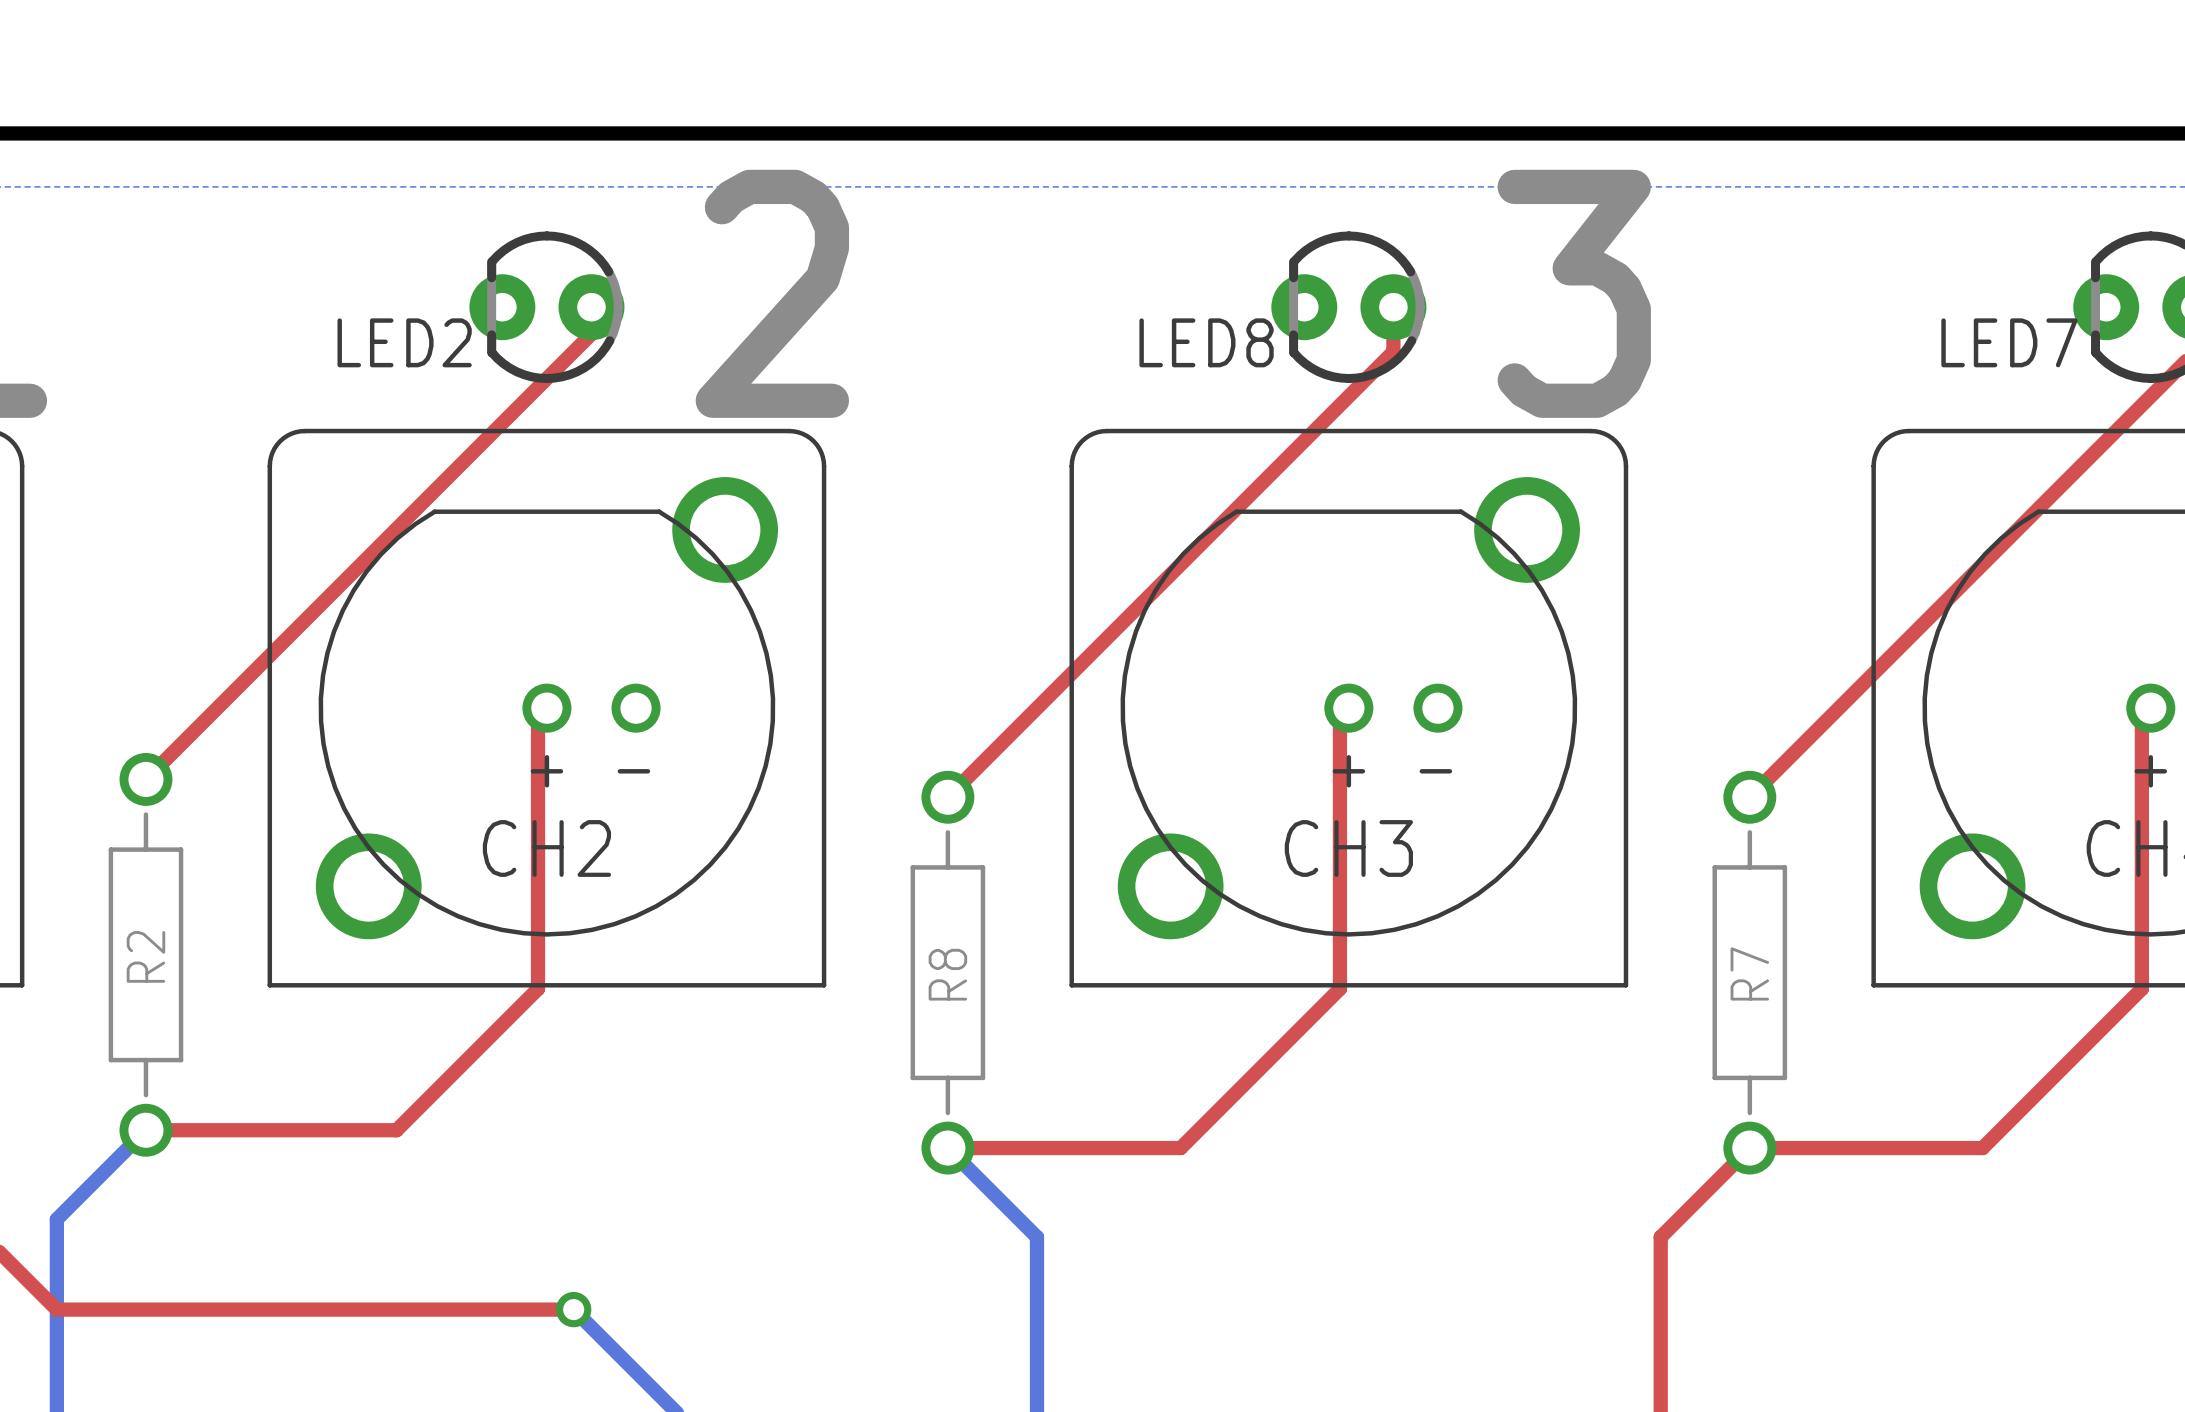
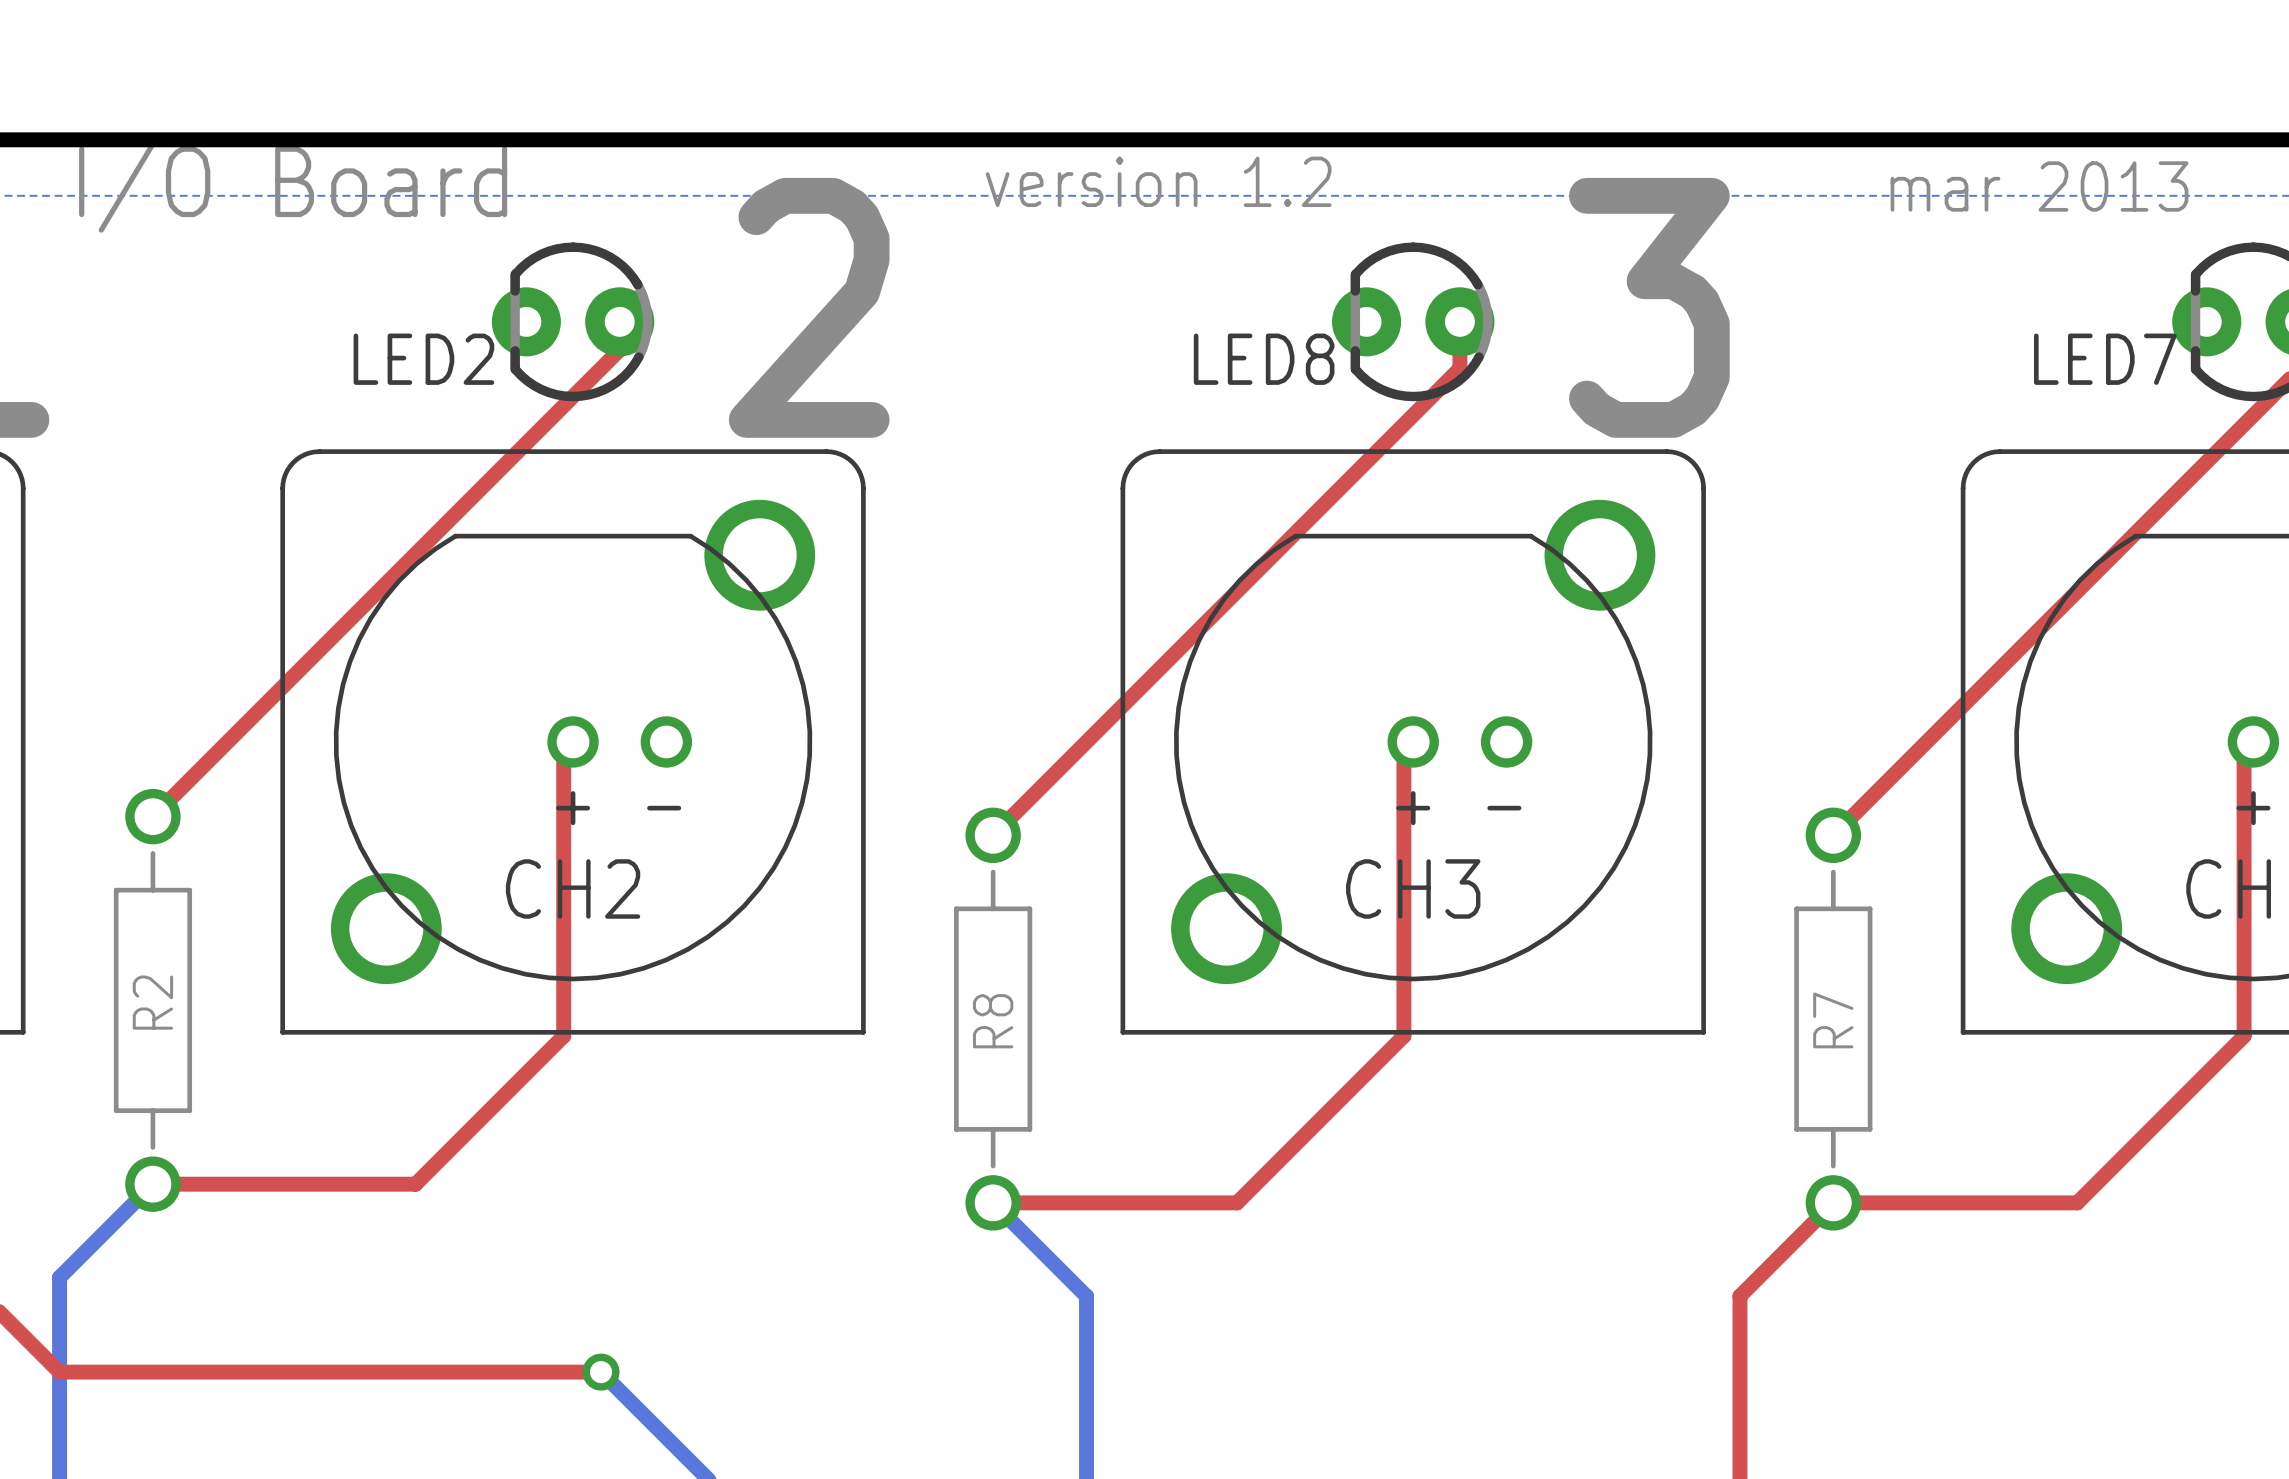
text: none -> version 1.2 (1158, 181)
text: none -> mar 2013 (2039, 186)
text: none -> I/O Board (293, 188)

